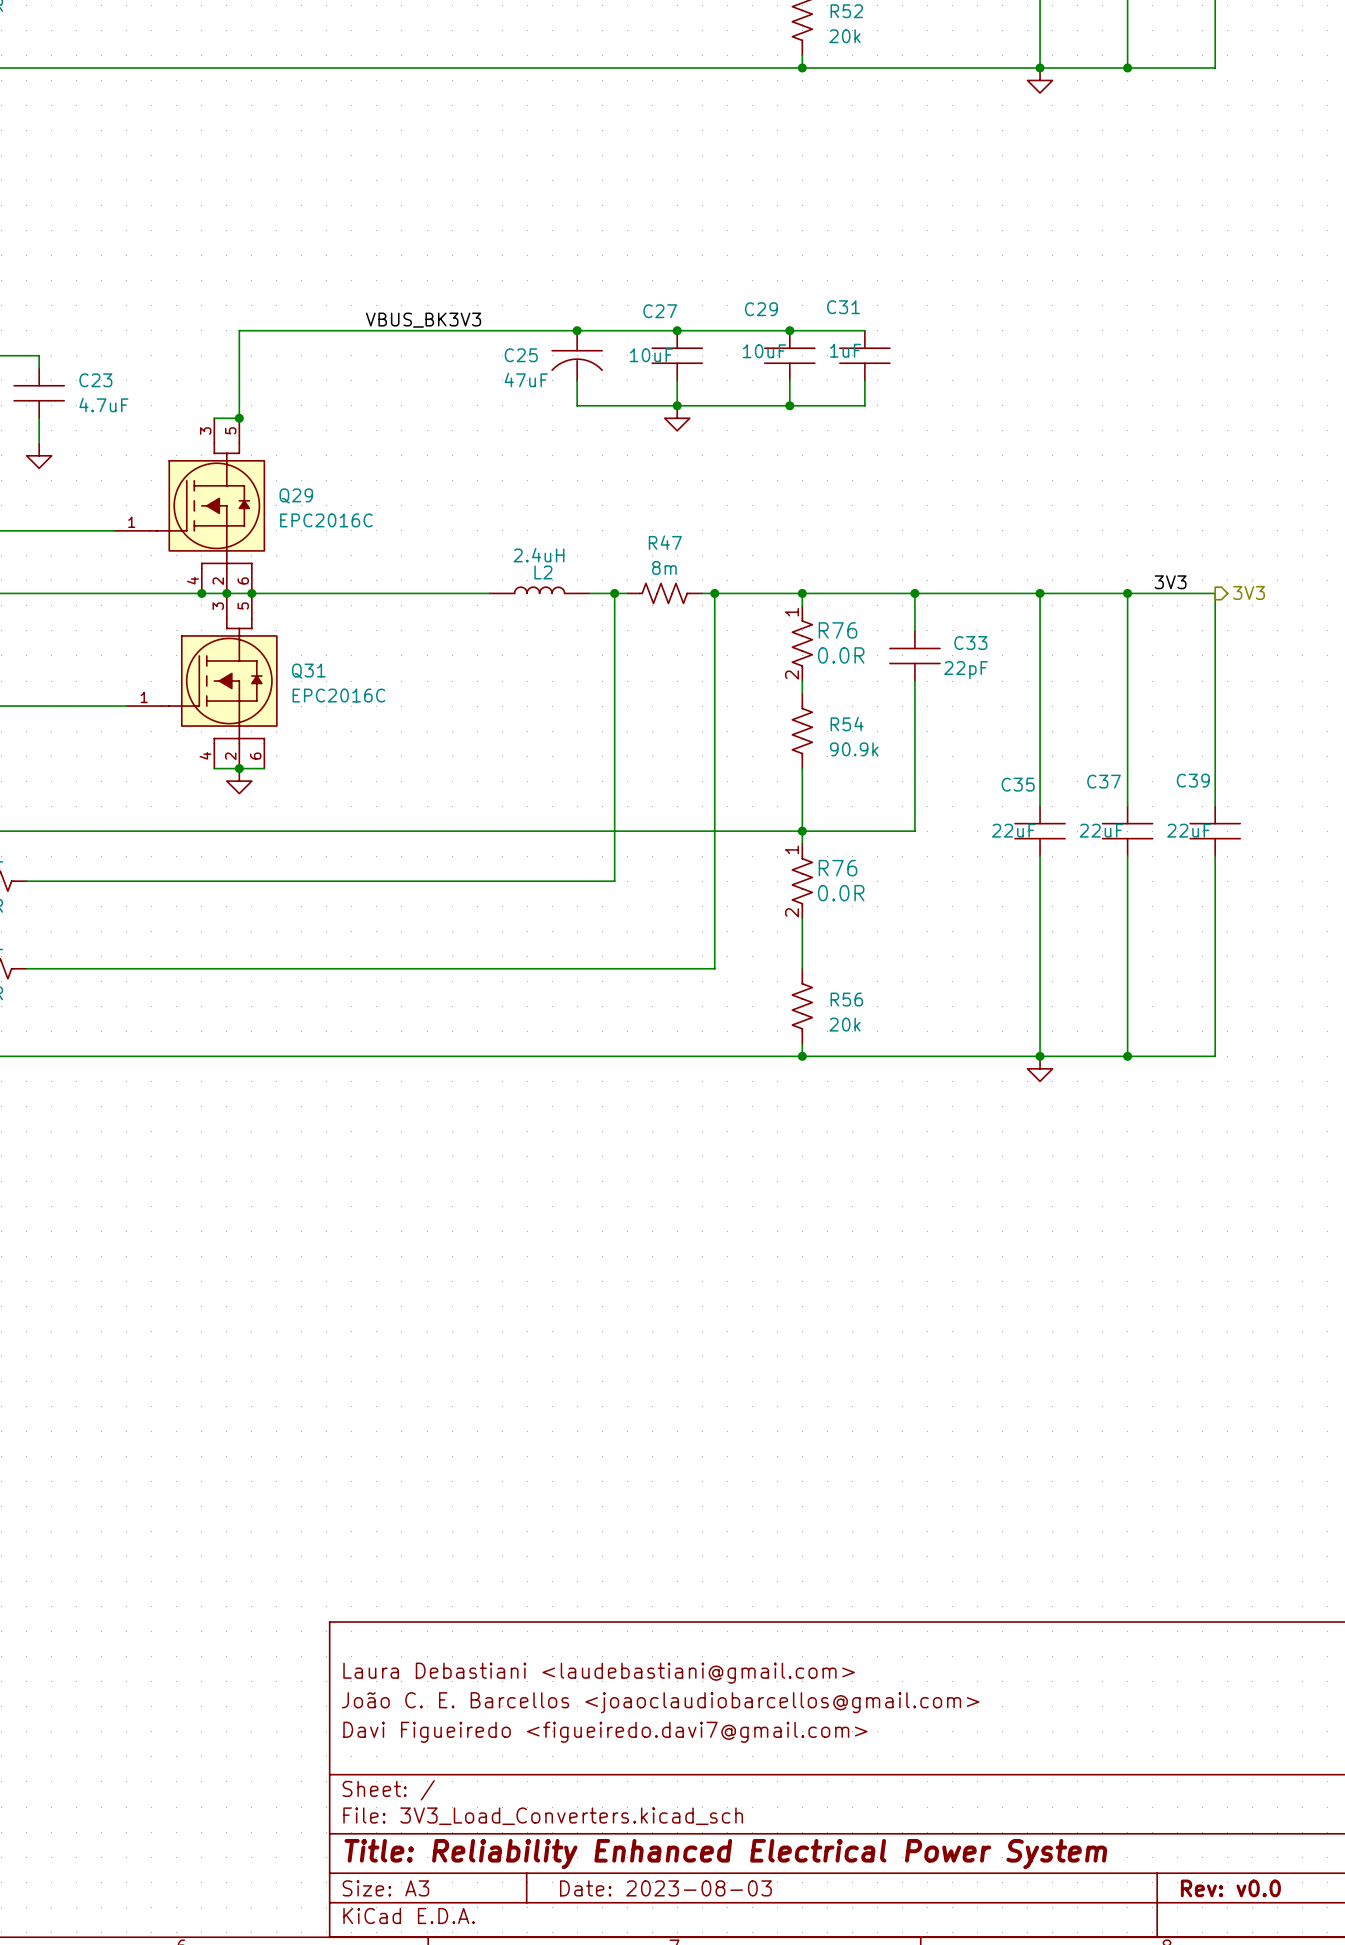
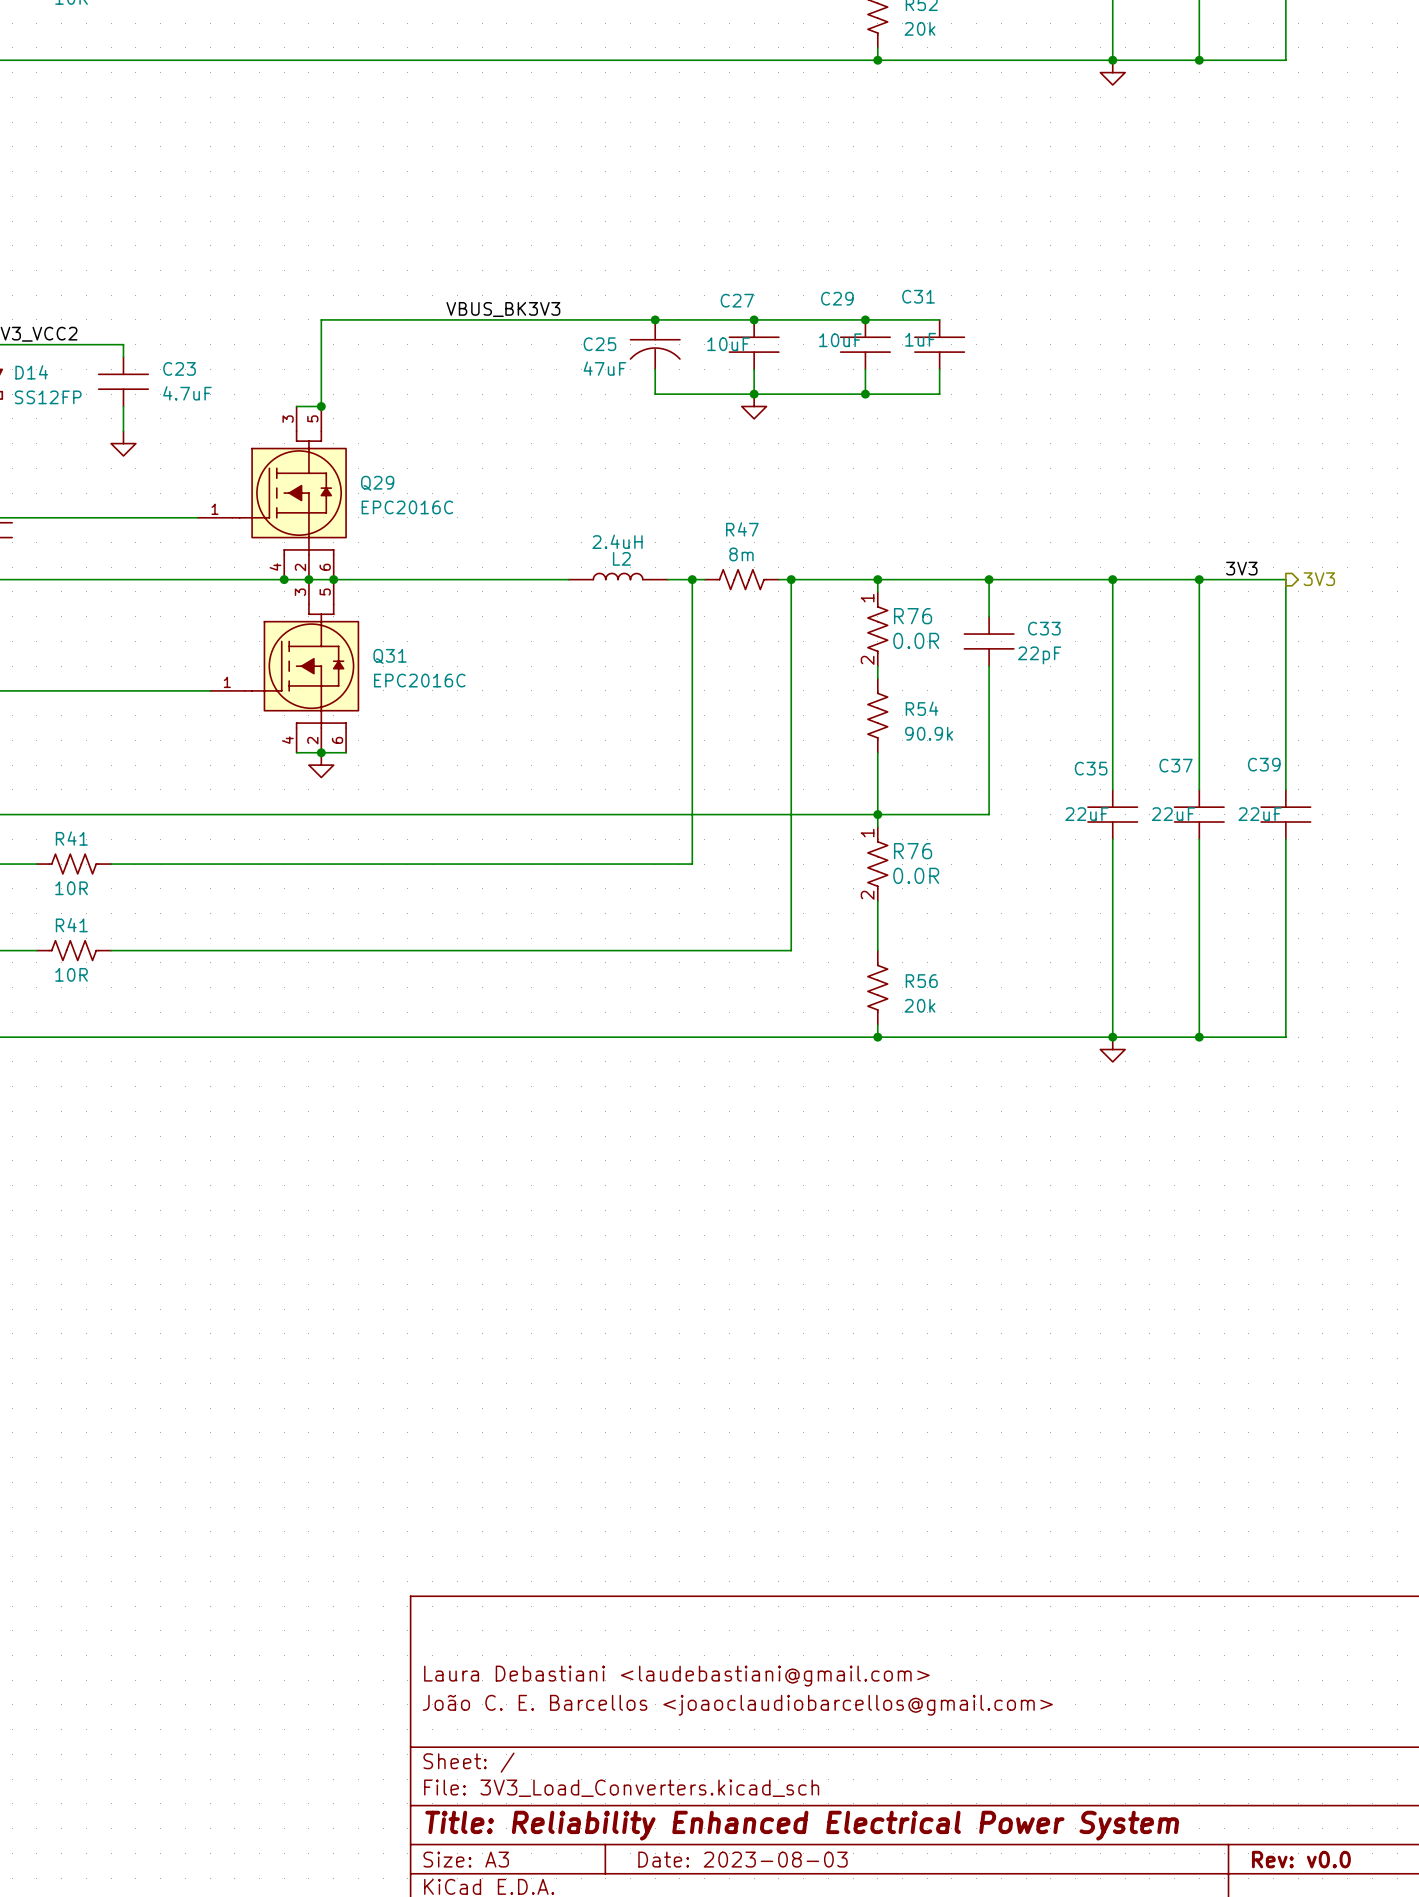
title block: Laura Debastiani <laudebastiani@gmail.com> (599, 1673) -> none
title block: João C. E. Barcellos <joaoclaudiobarcellos@gmail.com> (660, 1702) -> Laura Debastiani <laudebastiani@gmail.com> (676, 1676)
title block: Davi Figueiredo <figueiredo.davi7@gmail.com> (605, 1732) -> João C. E. Barcellos <joaoclaudiobarcellos@gmail.com> (737, 1705)

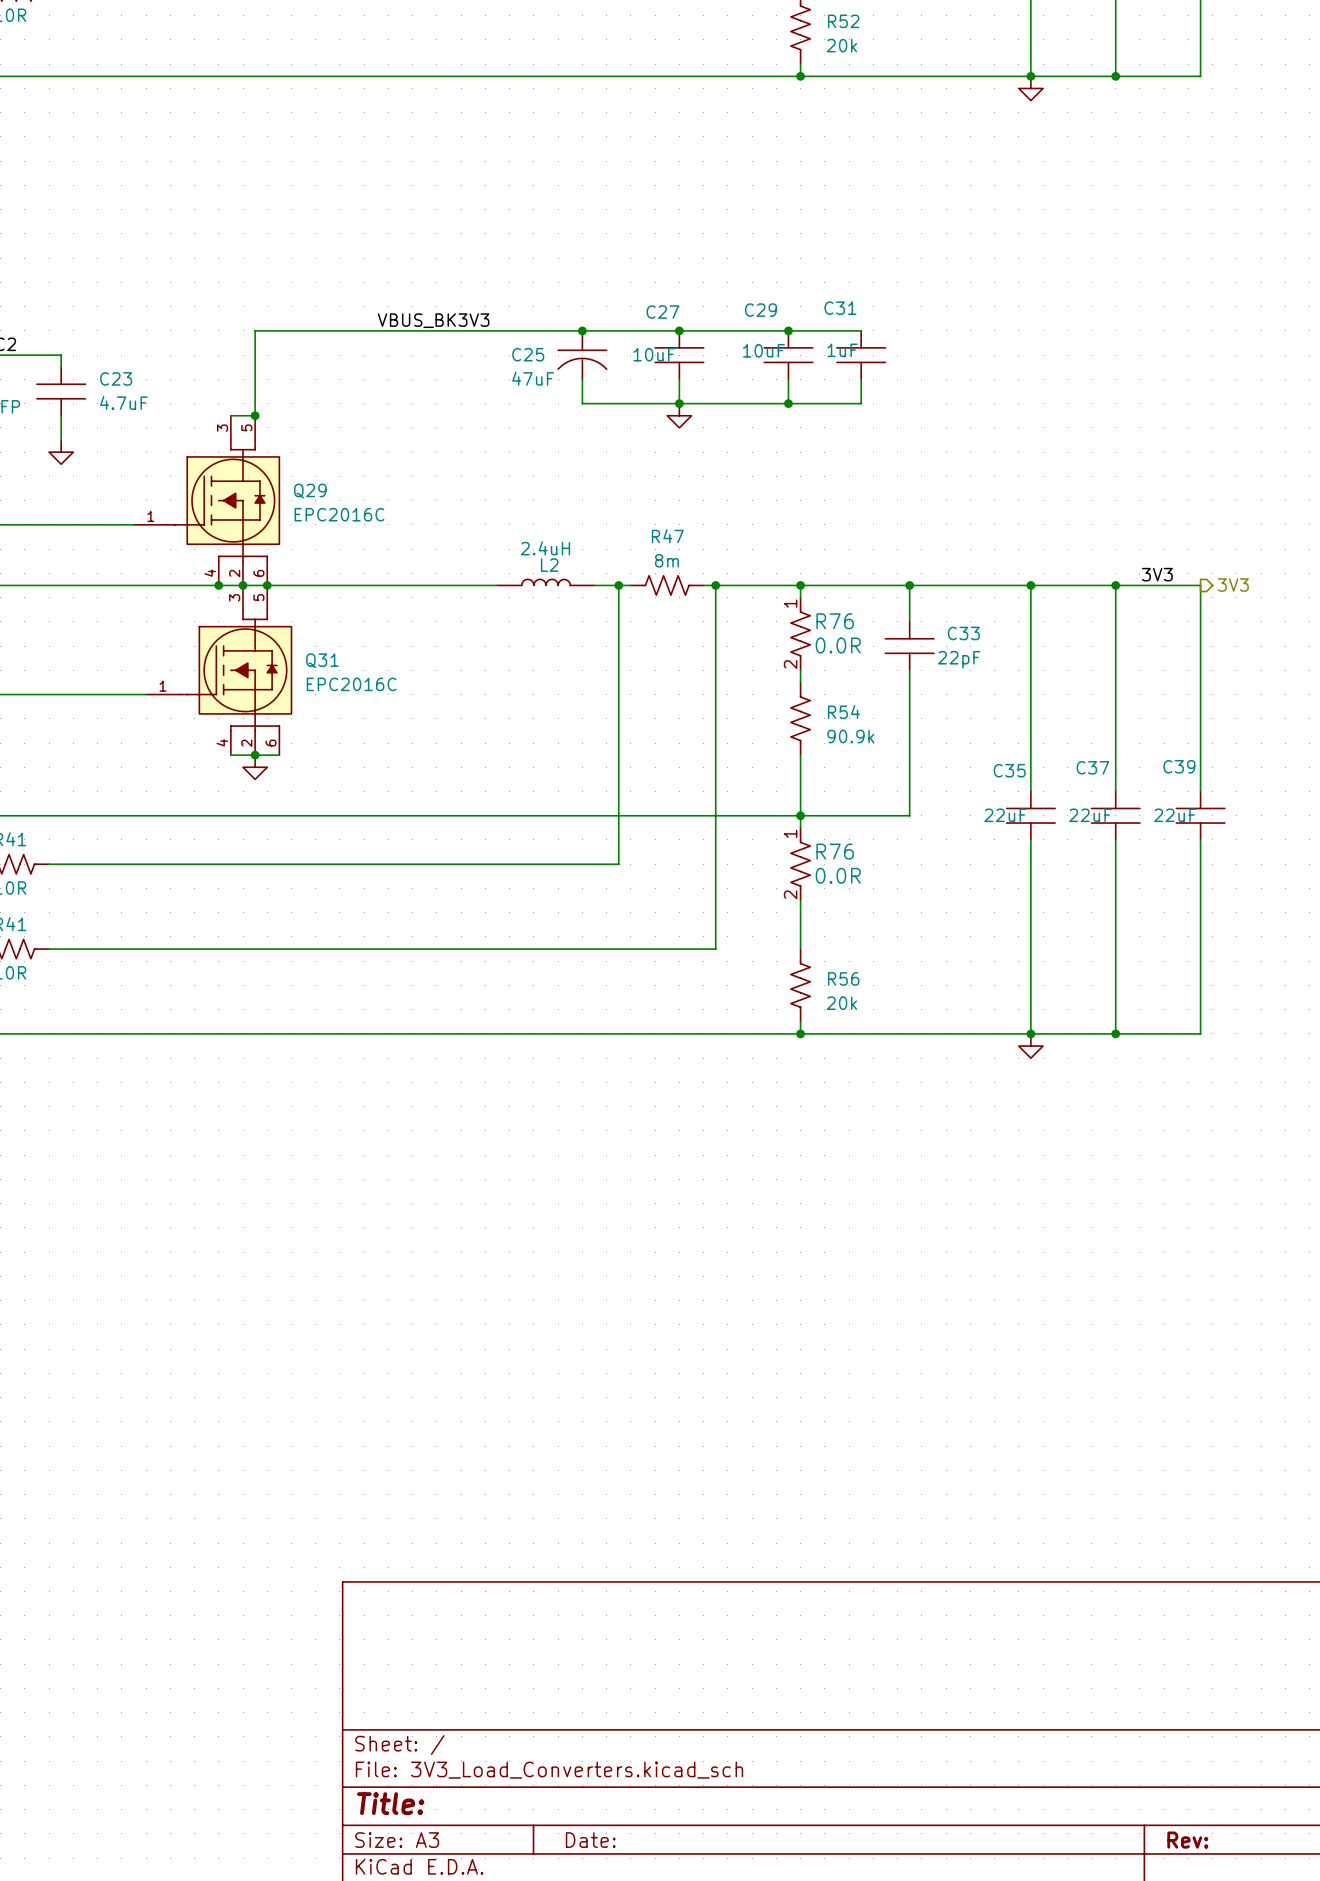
title block: Laura Debastiani <laudebastiani@gmail.com> (676, 1676) -> none
title block: João C. E. Barcellos <joaoclaudiobarcellos@gmail.com> (737, 1705) -> none
title block: Title: Reliability Enhanced Electrical Power System (802, 1825) -> Title: (390, 1803)
title block: Date: 2023-08-03 (742, 1859) -> Date: (590, 1840)
title block: Rev: v0.0 (1301, 1859) -> Rev: (1187, 1840)

